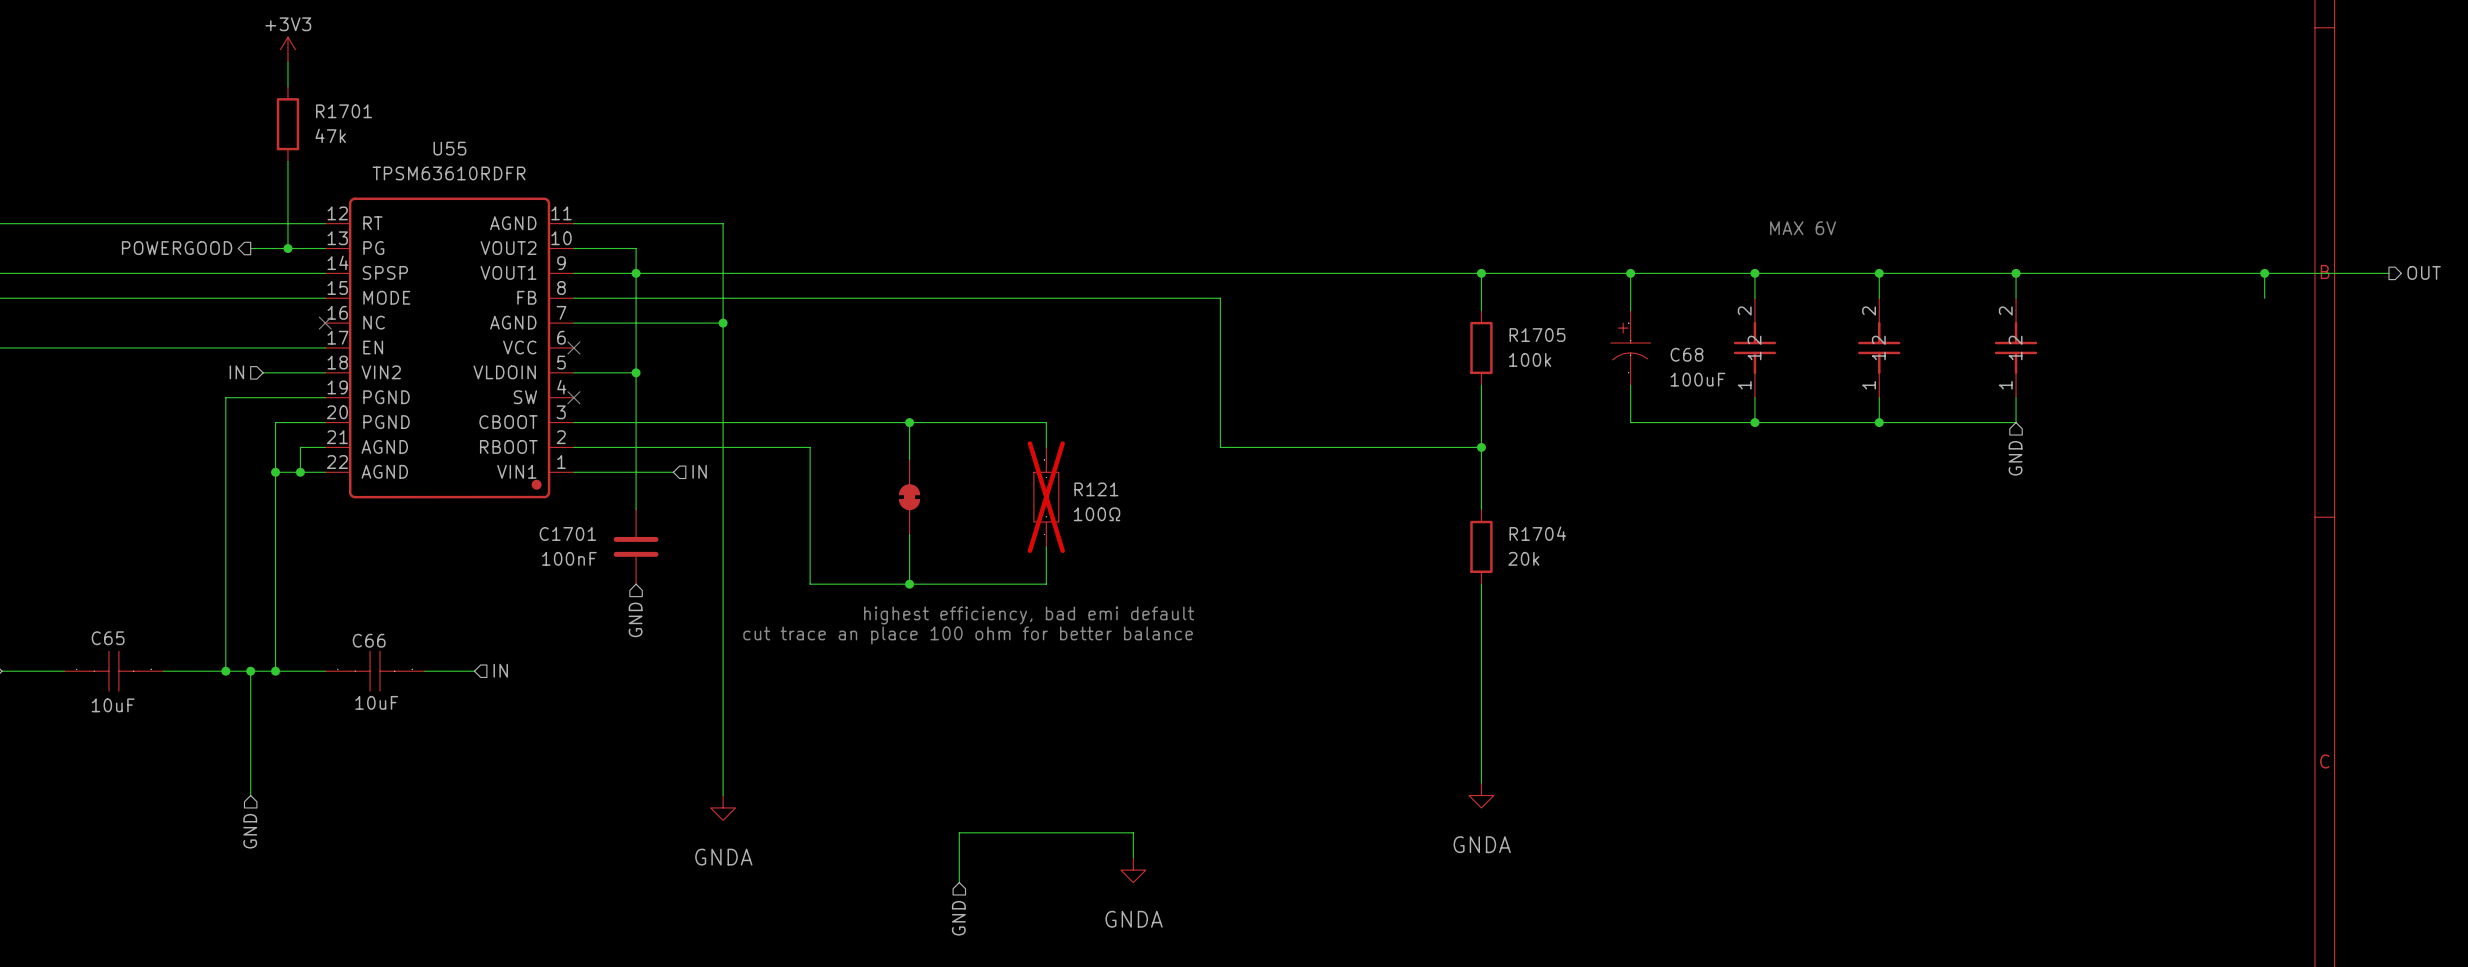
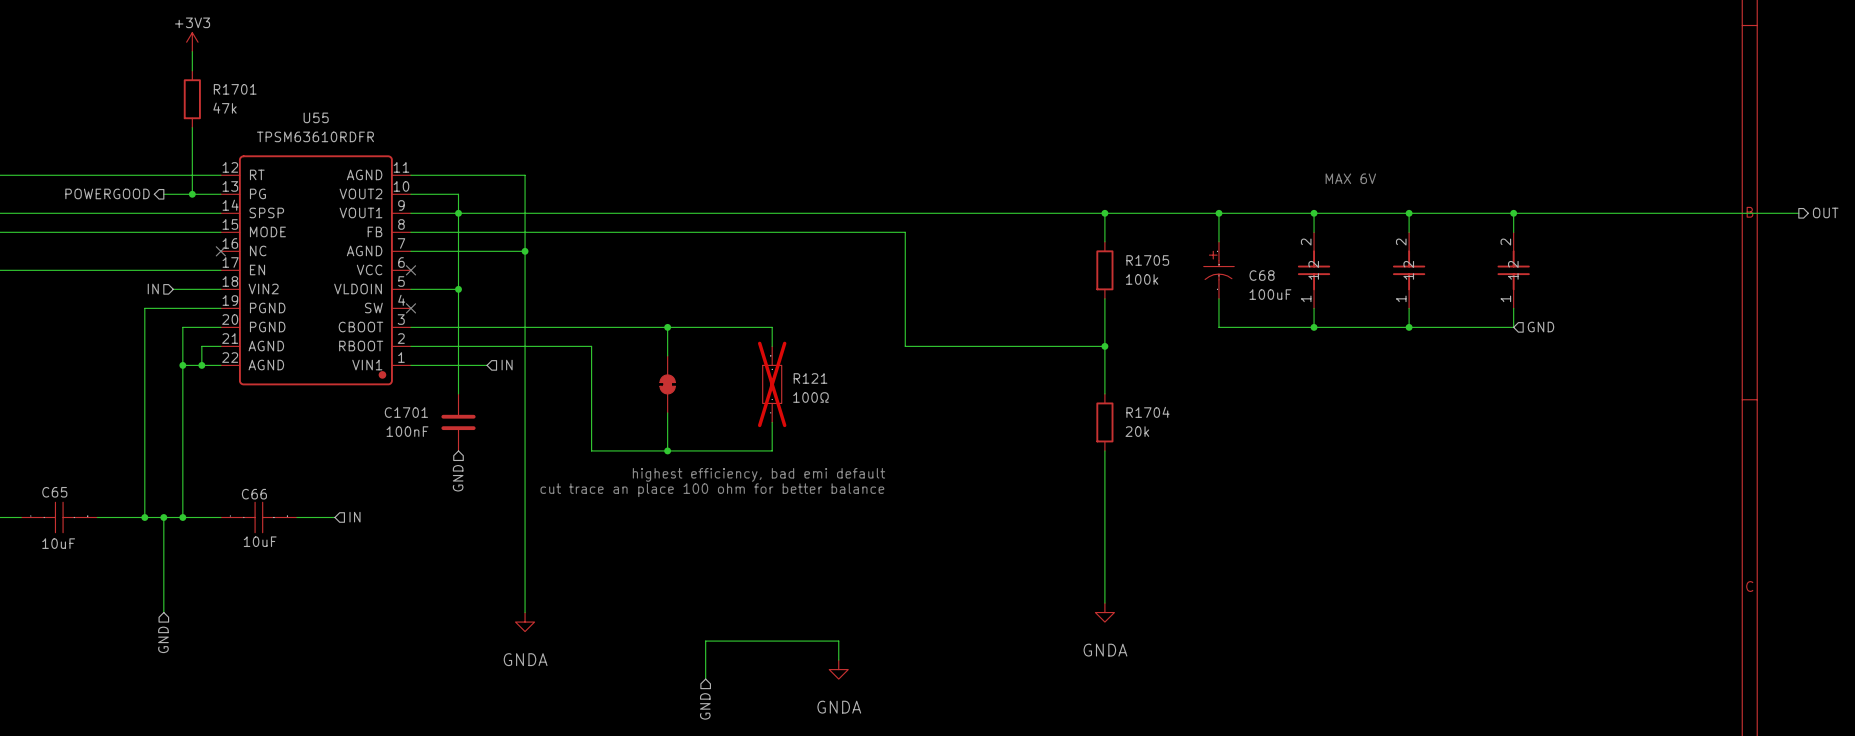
wire: (2264, 273) (2264, 298) -> none
junction: (2264, 273) -> none
hierarchical label rotation: 0° (2015, 458) -> 90° counterclockwise (1540, 327)
hierarchical label position: GND (2015, 458) -> GND (1540, 327)

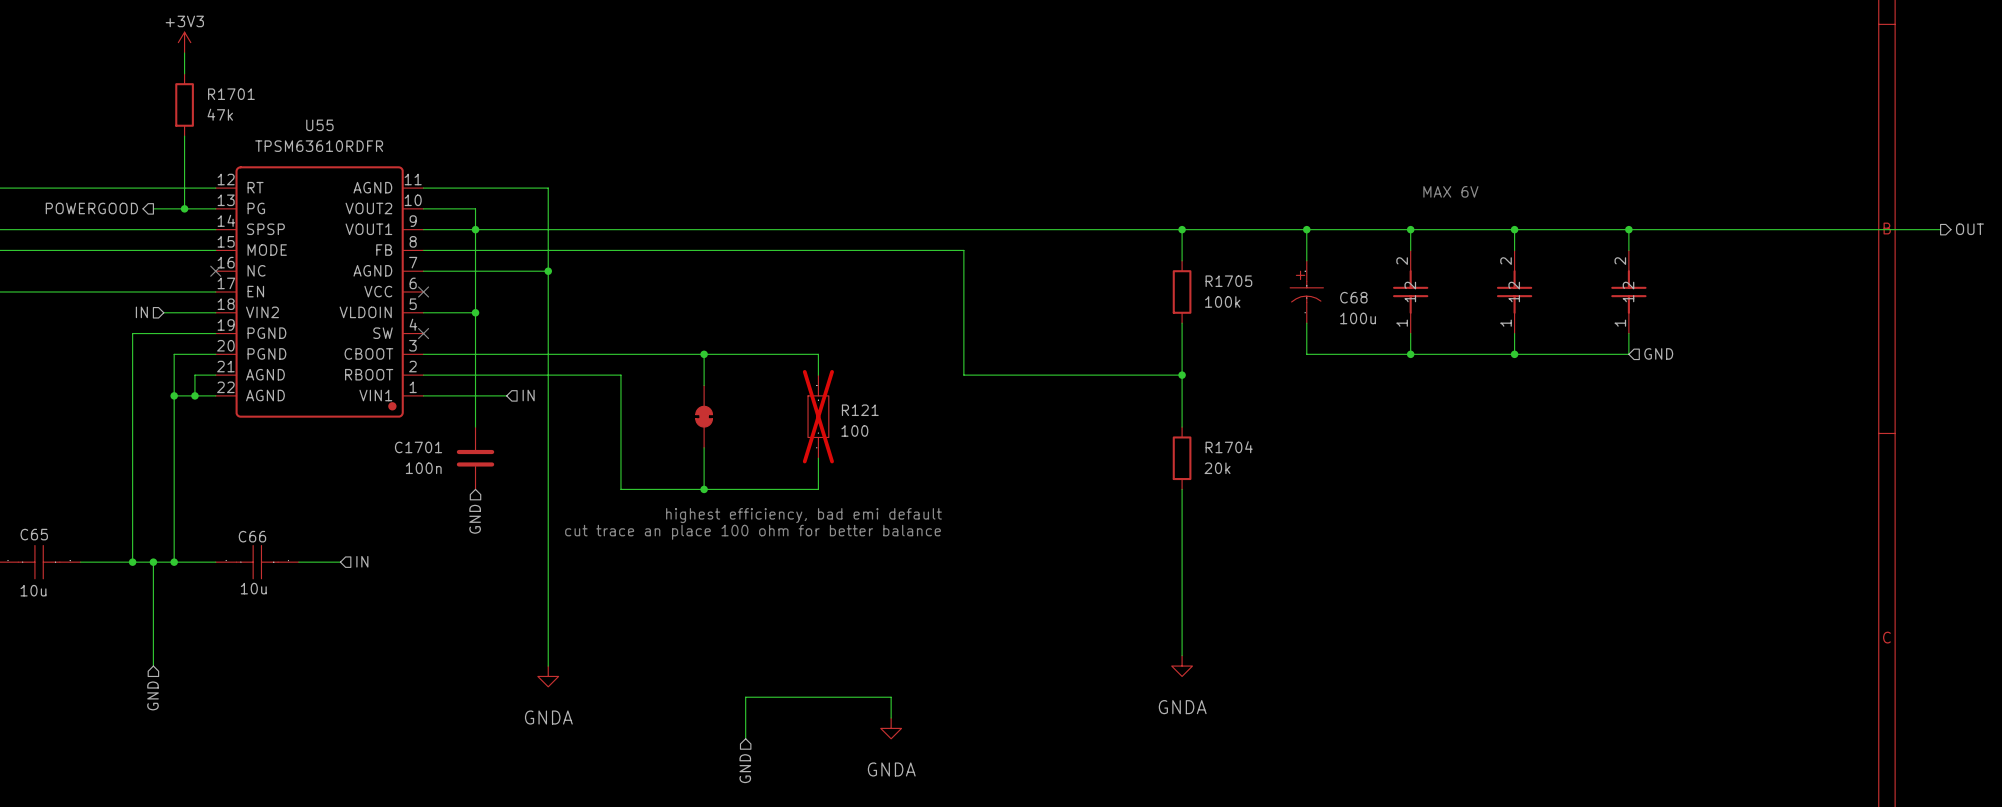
C68 value: 100uF (1270, 294) -> 100u (1358, 318)
R121 value: 100Ω (810, 397) -> 100 (854, 430)
C1701 value: 100nF (407, 431) -> 100n (423, 468)
C66 value: 10uF (260, 541) -> 10u (253, 588)
C65 value: 10uF (58, 543) -> 10u (33, 590)

